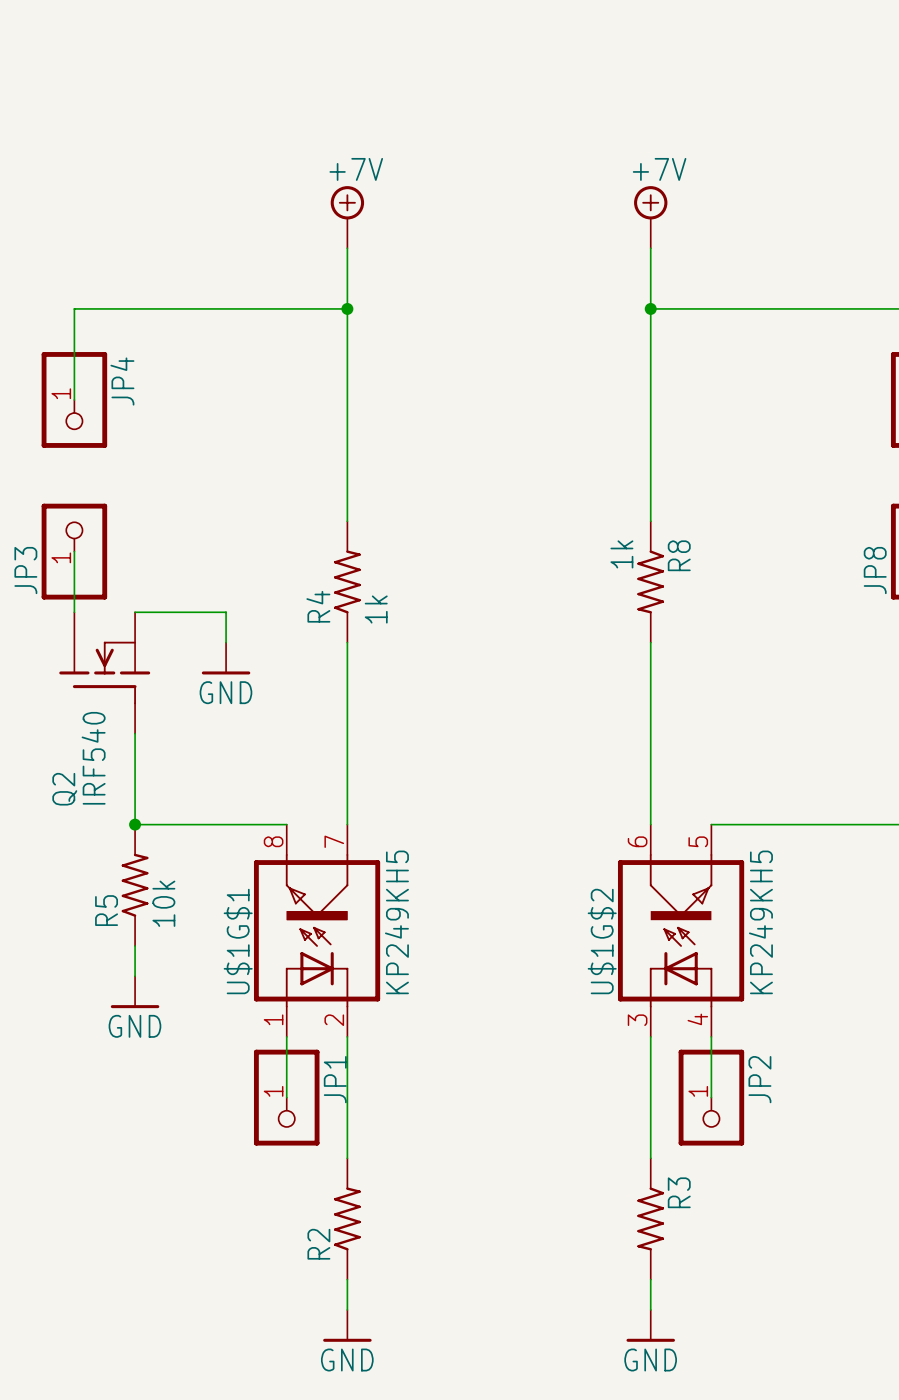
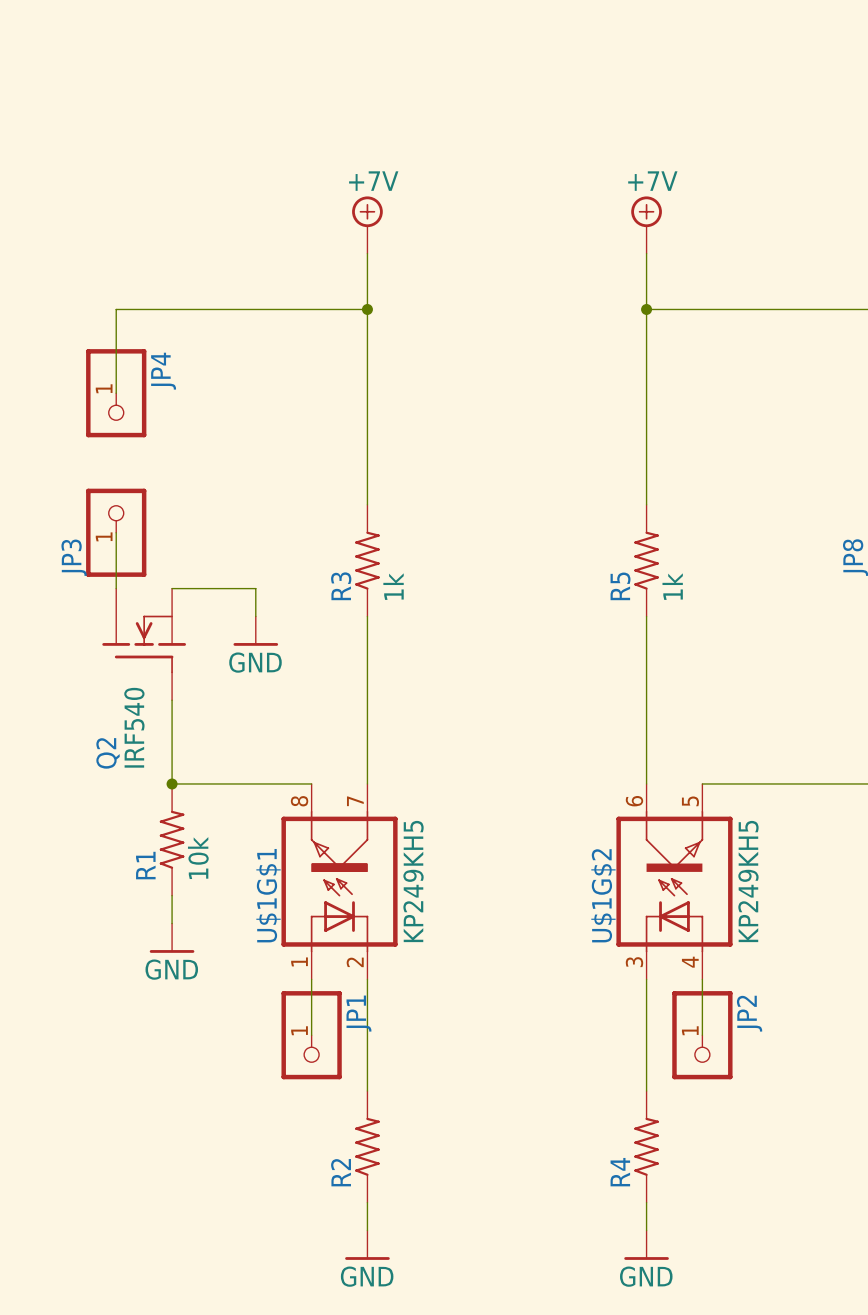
R8: 1k (650, 581) -> none
R5: none -> 1k (646, 560)
R4 name: R4 (318, 606) -> R3 (341, 586)
R5 name: R5 (106, 910) -> R1 (145, 865)
R3: (650, 1218) -> none
R4: none -> (646, 1146)

